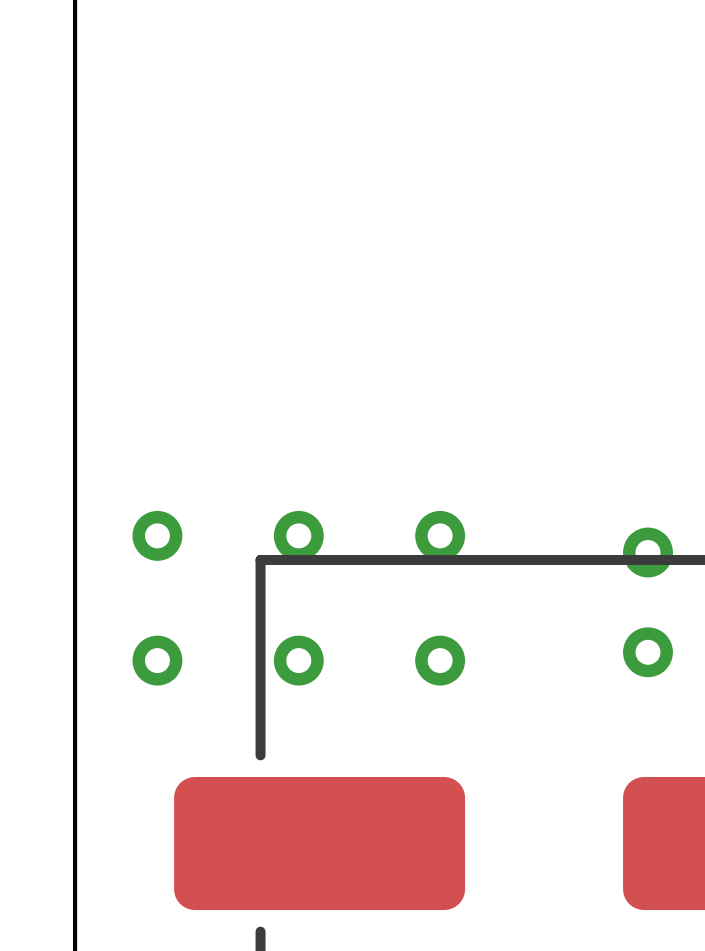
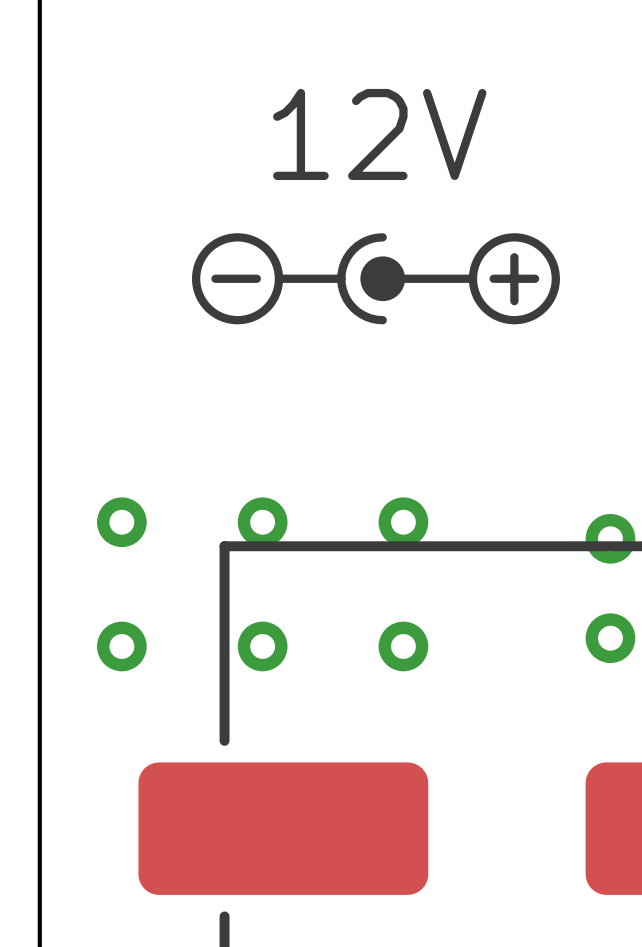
text: none -> 12V (379, 134)
drawing: none -> [191, 233, 560, 325]
line: none -> (382, 237) (366, 240) (353, 249) (344, 262) (341, 278) (344, 294) (353, 308) (366, 317) (382, 320)
line: none -> (514, 257) (514, 301)
line: none -> (215, 278) (256, 278)
line: none -> (278, 278) (341, 278)
line: none -> (382, 278) (473, 278)
line: none -> (493, 278) (535, 278)

